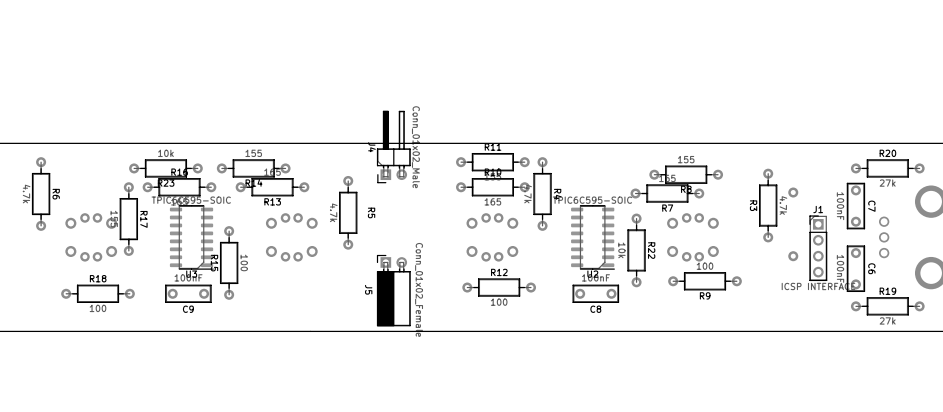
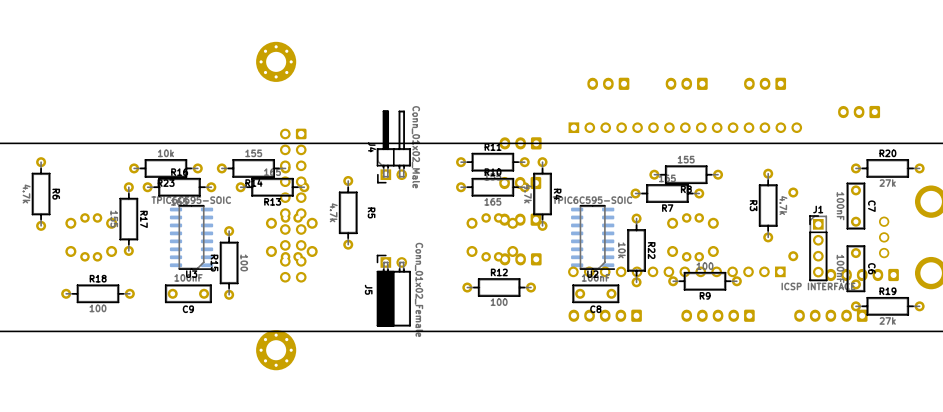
part: none -> (276, 61)
part: none -> (608, 83)
part: none -> (686, 83)
part: none -> (765, 83)
part: none -> (859, 112)
part: none -> (685, 127)
part: none -> (520, 143)
part: none -> (520, 183)
part: none -> (293, 205)
part: none -> (520, 219)
part: none -> (520, 259)
part: none -> (676, 271)
part: none -> (862, 274)
part: none -> (605, 315)
part: none -> (718, 315)
part: none -> (830, 315)
part: none -> (276, 350)

